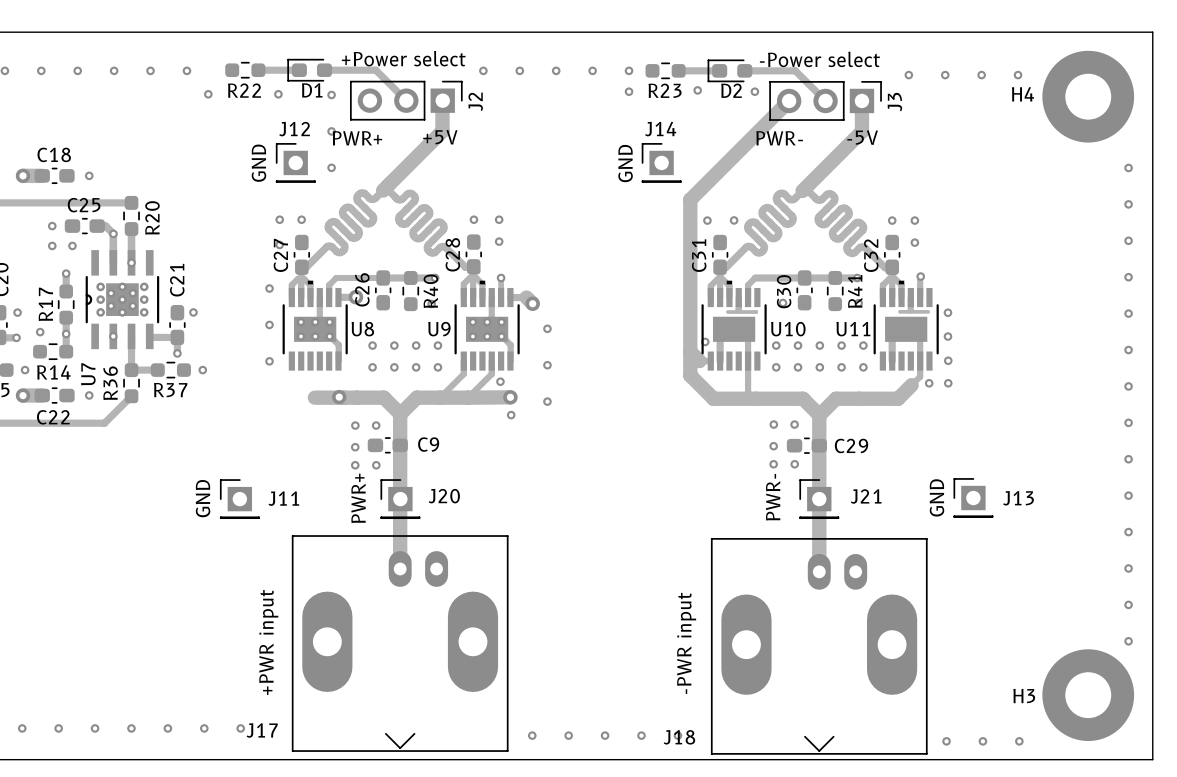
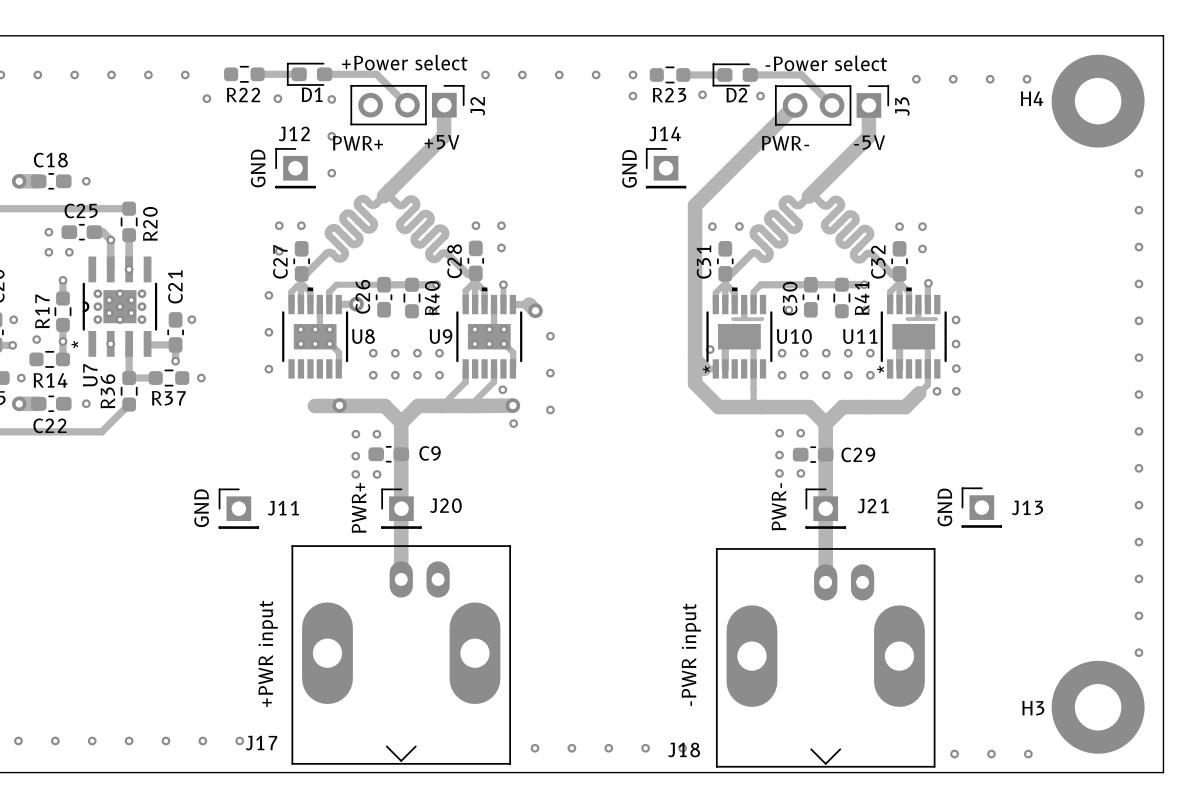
U7 footprint: [85, 250, 160, 350] -> [82, 256, 158, 357]
U10 text: none -> * (706, 369)
U11 text: none -> * (880, 369)

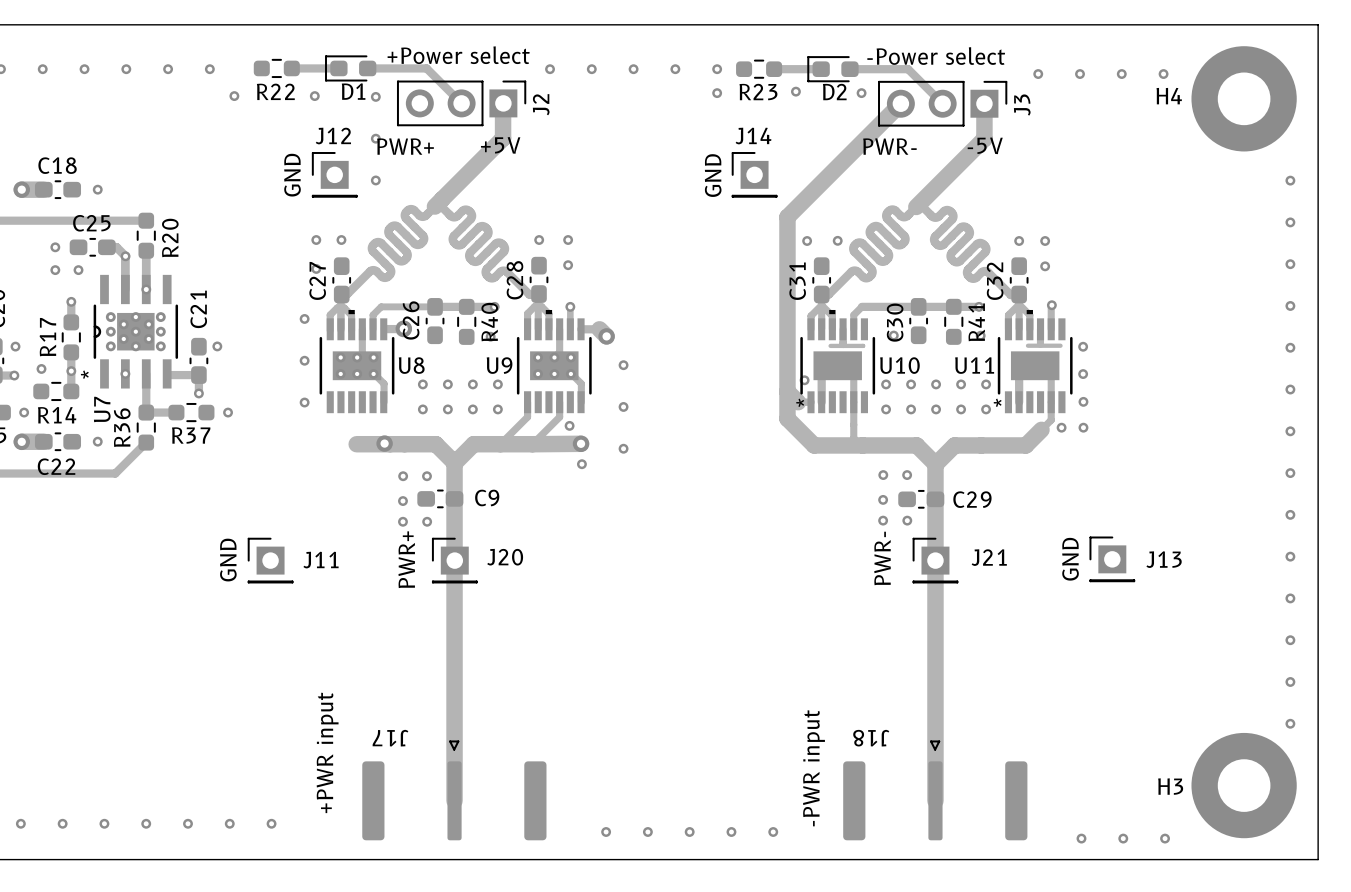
J17 footprint: [291, 545, 511, 765] -> [362, 740, 547, 841]
J18 footprint: [715, 548, 936, 768] -> [843, 740, 1028, 841]
track: none -> (454, 640) (454, 800)
track: none -> (935, 644) (935, 800)
text position: +PWR input (268, 653) -> +PWR input (327, 752)
text position: -PWR input (691, 654) -> -PWR input (814, 768)
J17 name position: J17 (261, 743) -> J17 (390, 738)
J18 name position: J18 (684, 749) -> J18 (871, 738)

